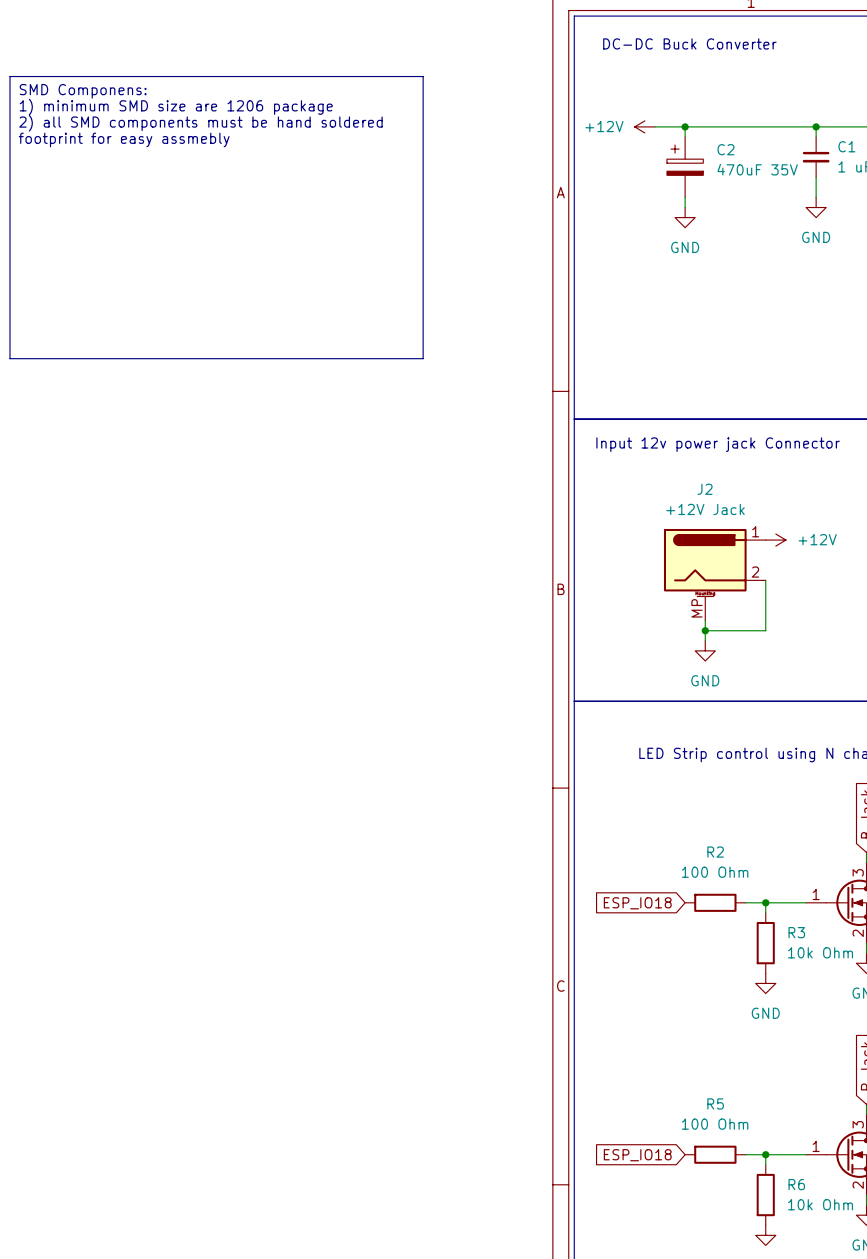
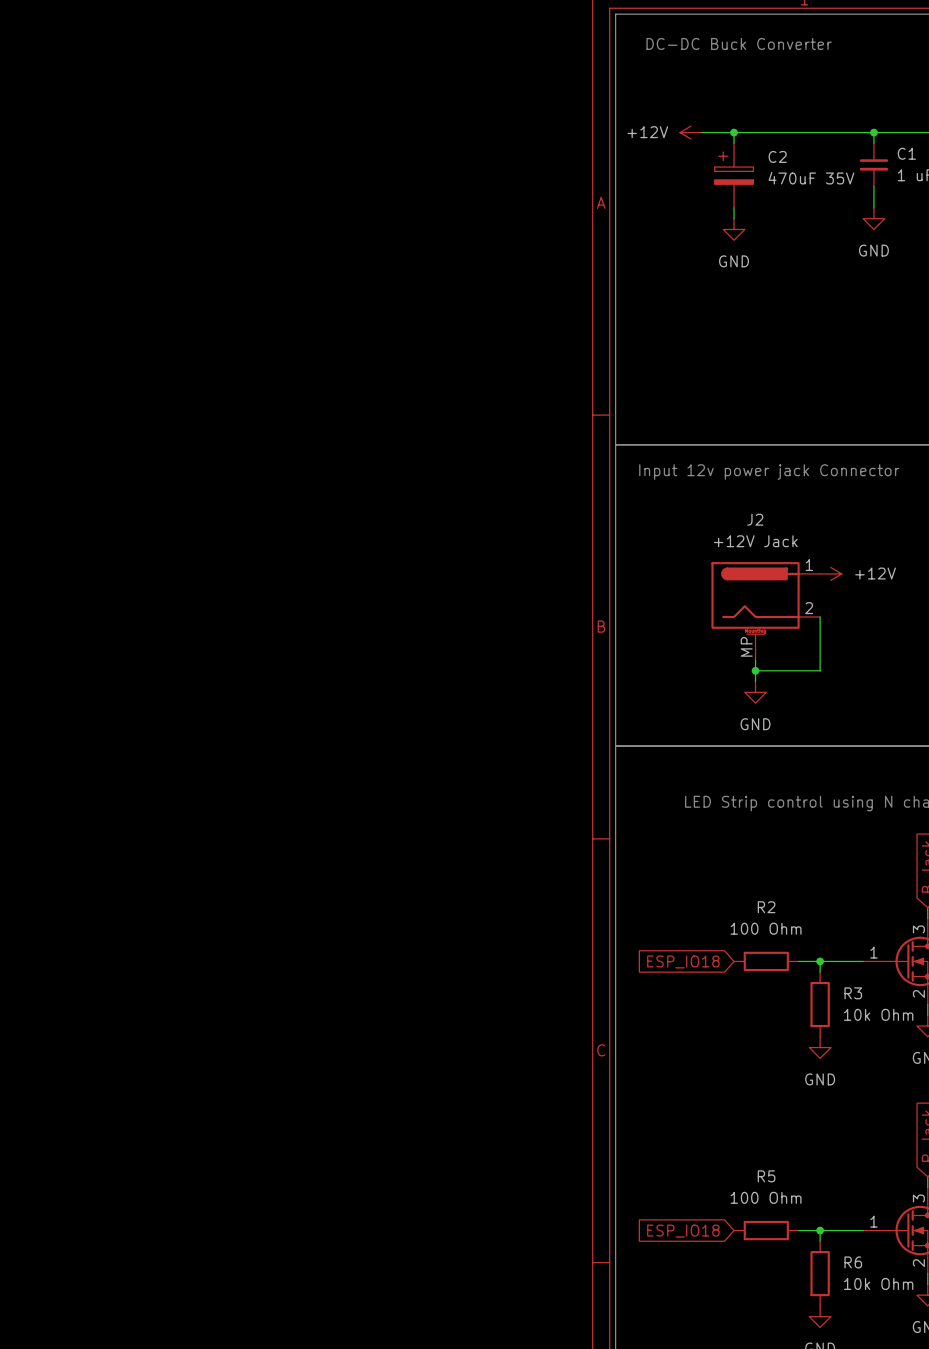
line: (10, 76) (423, 76) (423, 358) (10, 358) (10, 76) -> none
text: SMD Componens: (83, 91) -> none
text: 1) minimum SMD size are 1206 package (176, 107) -> none
text: 2) all SMD components must be hand soldered (200, 123) -> none
text: footprint for easy assmebly (124, 139) -> none

